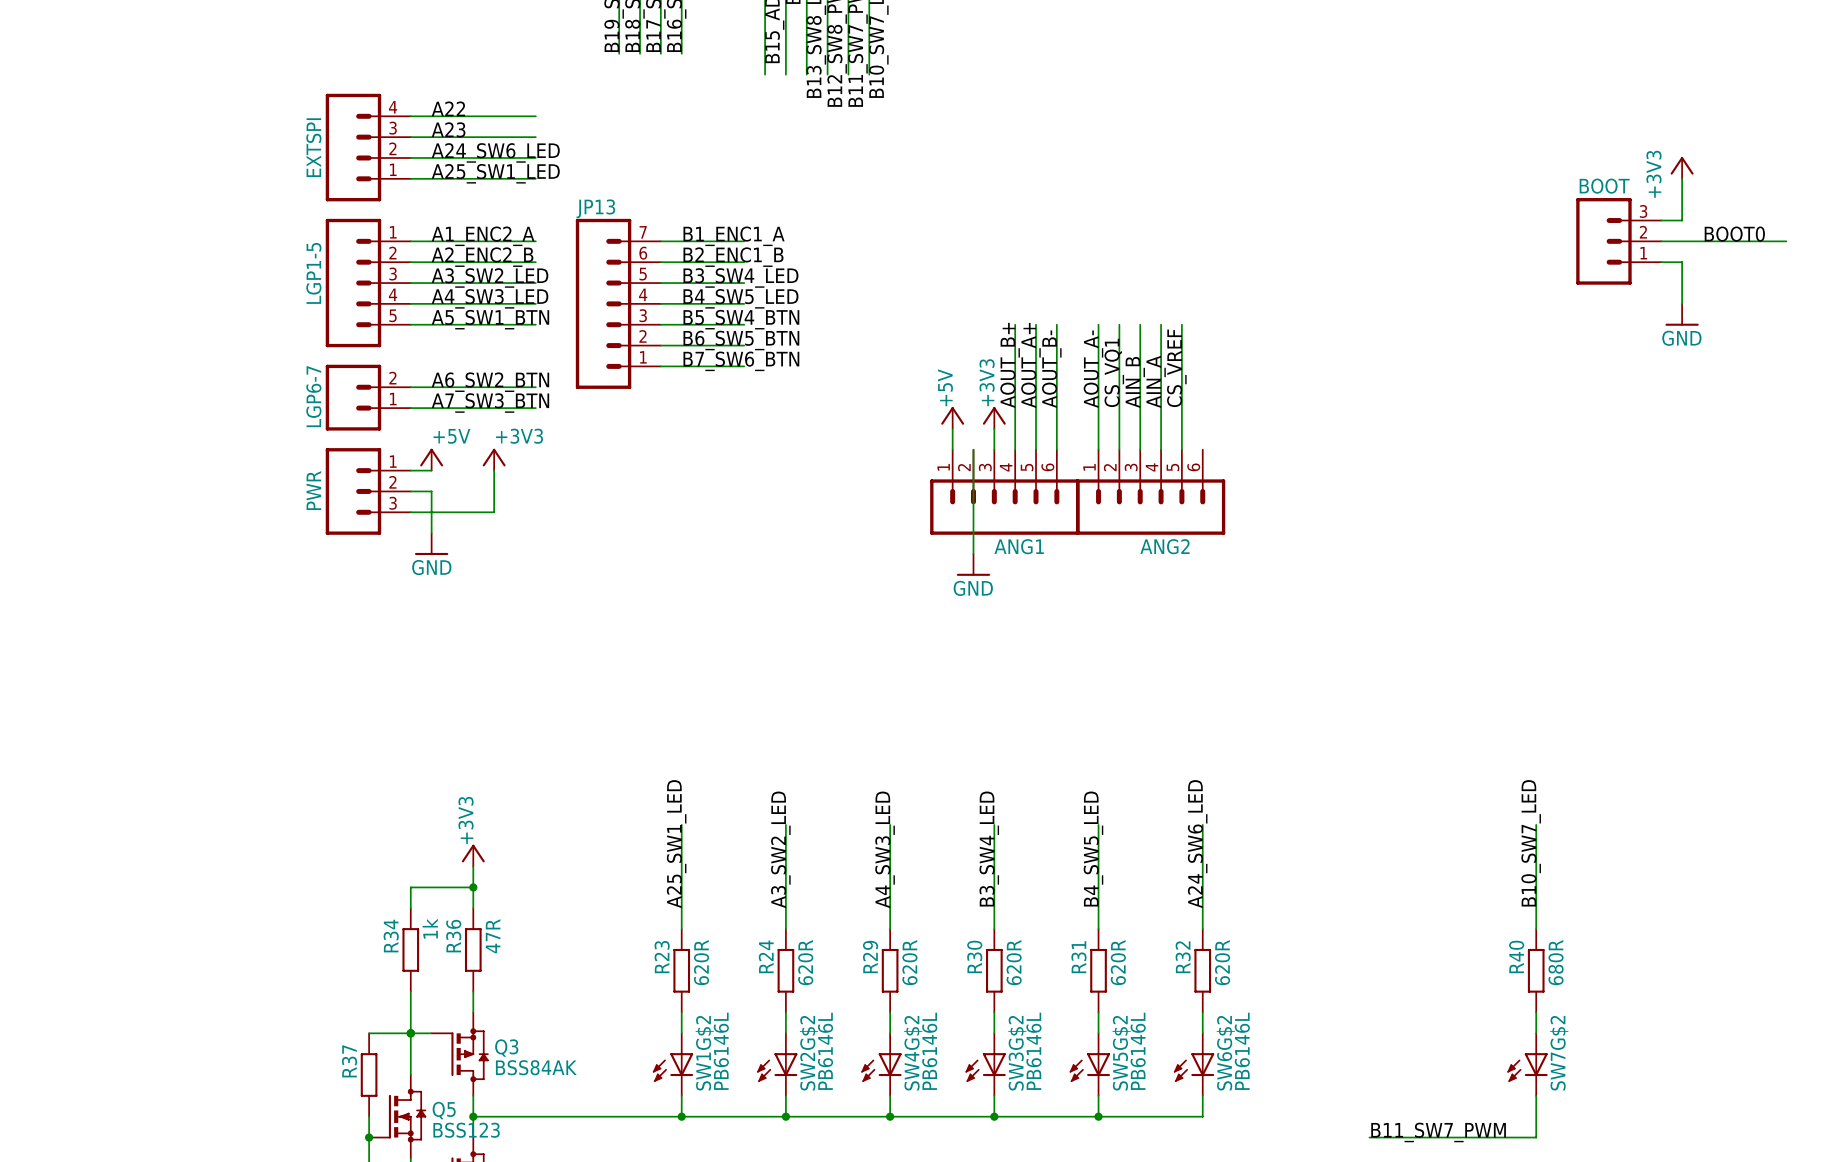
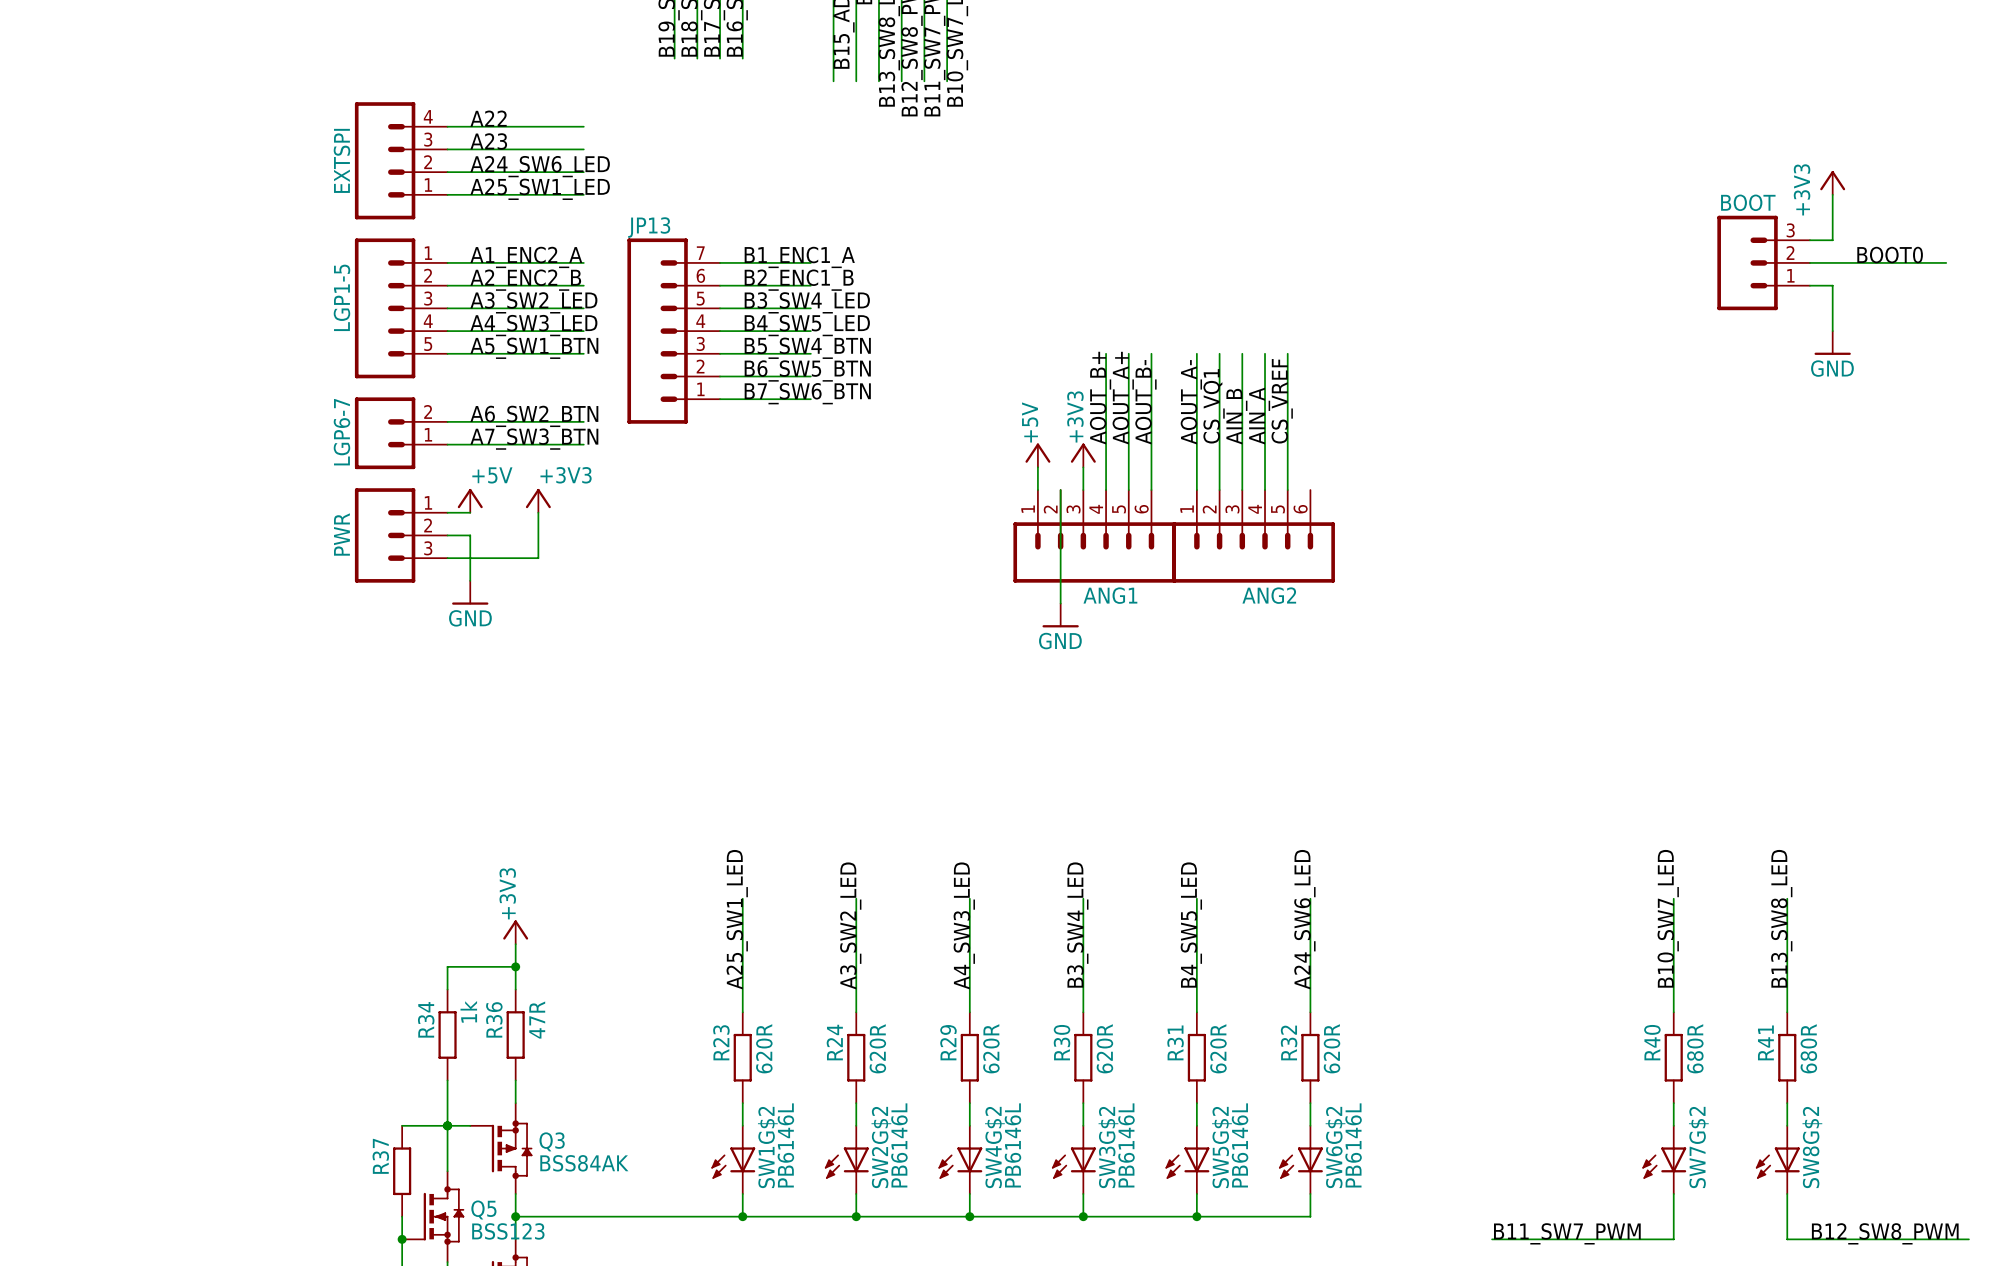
wire: none -> (1787, 898) (1787, 1012)
label: none -> B13_SW8_LED (1781, 918)
R41: none -> 680R (1787, 1057)
wire: none -> (1787, 1103) (1787, 1125)
SW8G$2: none -> (1777, 1159)
wire: none -> (1787, 1193) (1787, 1239) (1968, 1239)
label: none -> B12_SW8_PWM (1885, 1233)

